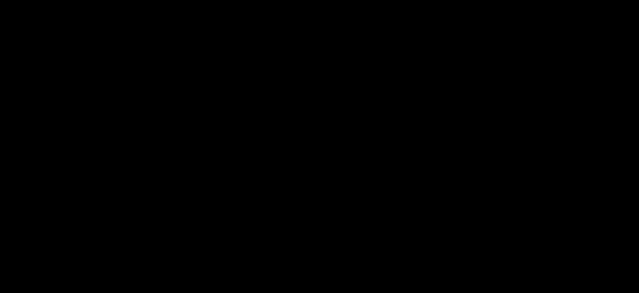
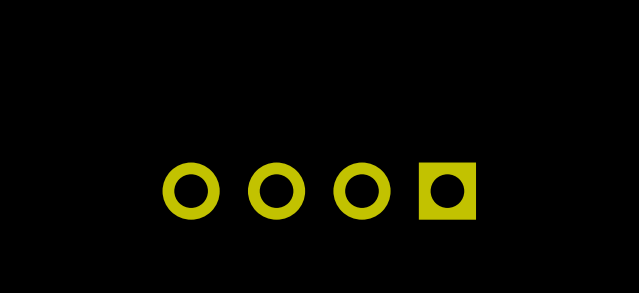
part: none -> (319, 191)

